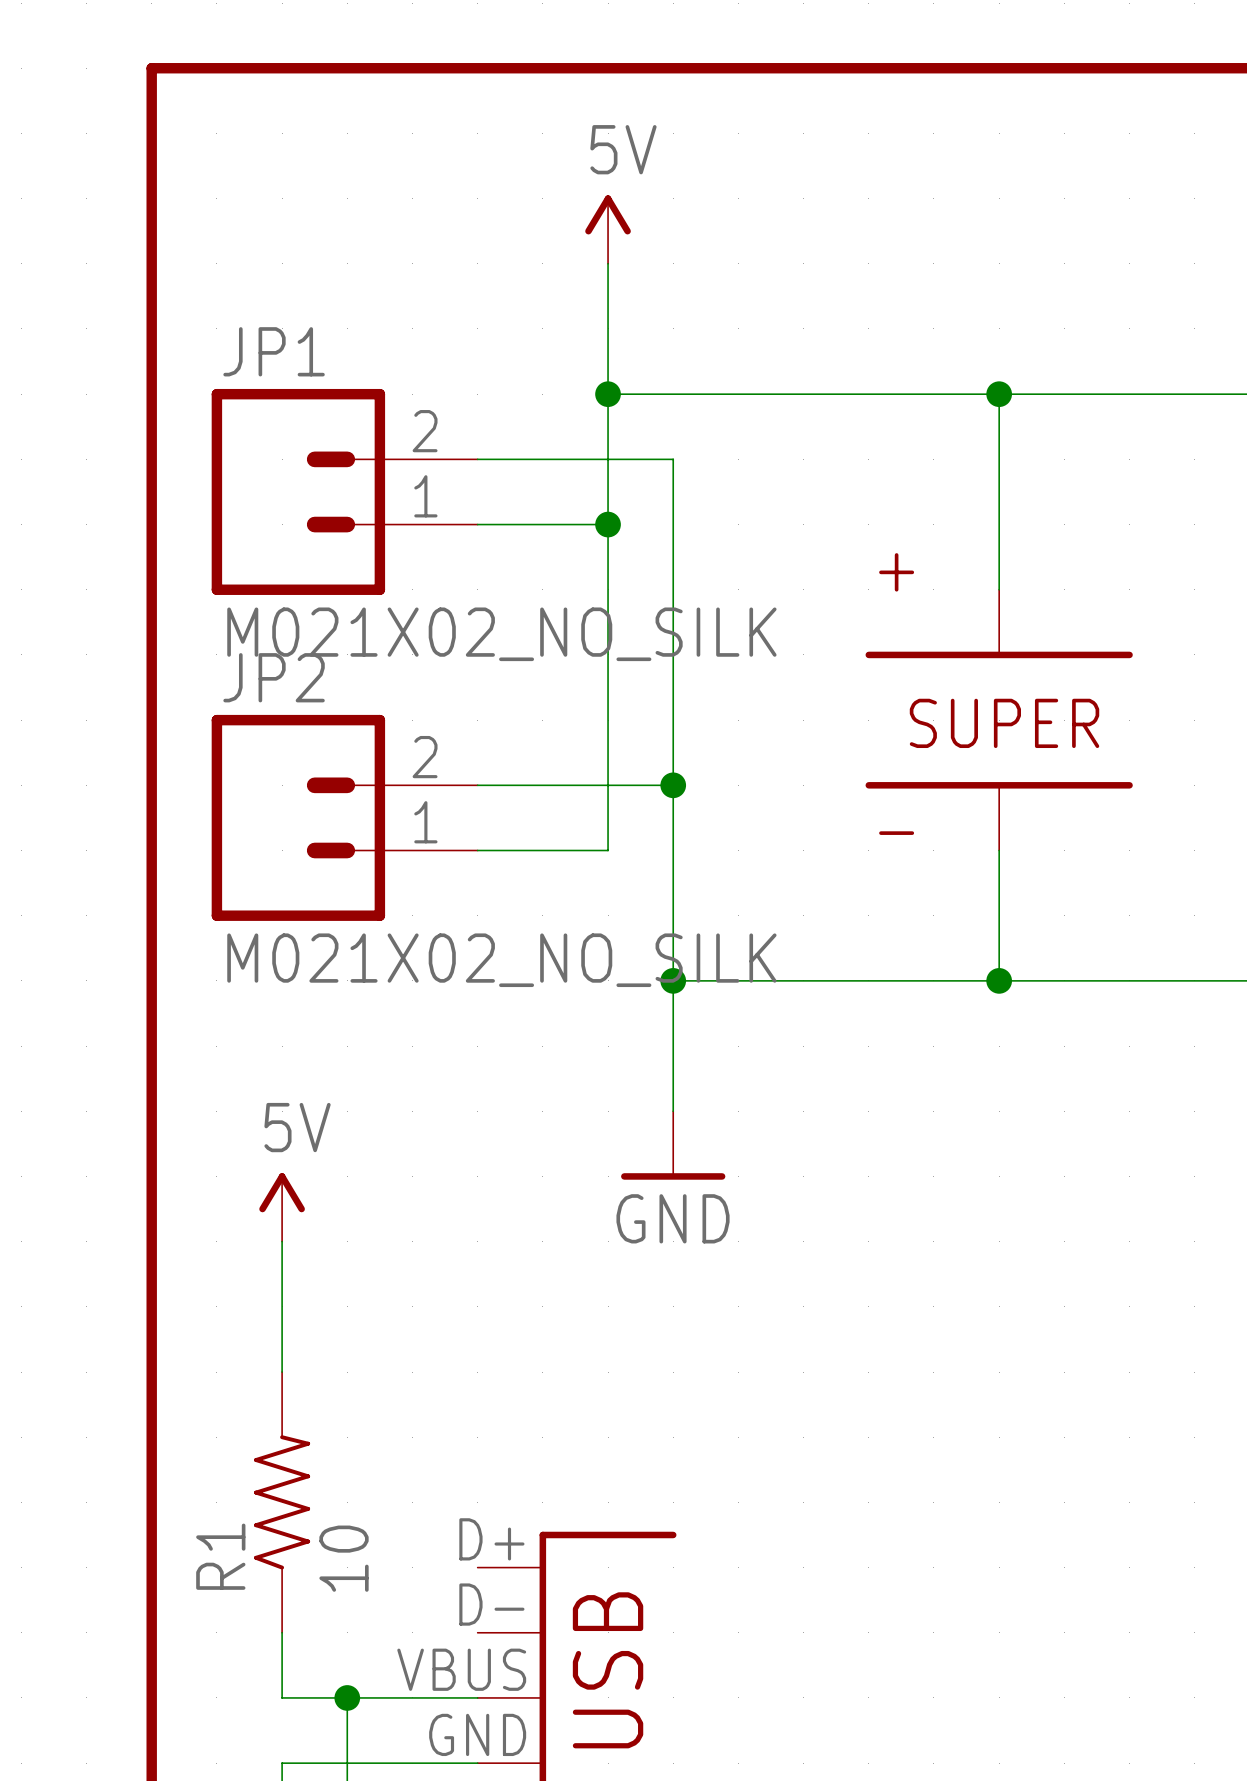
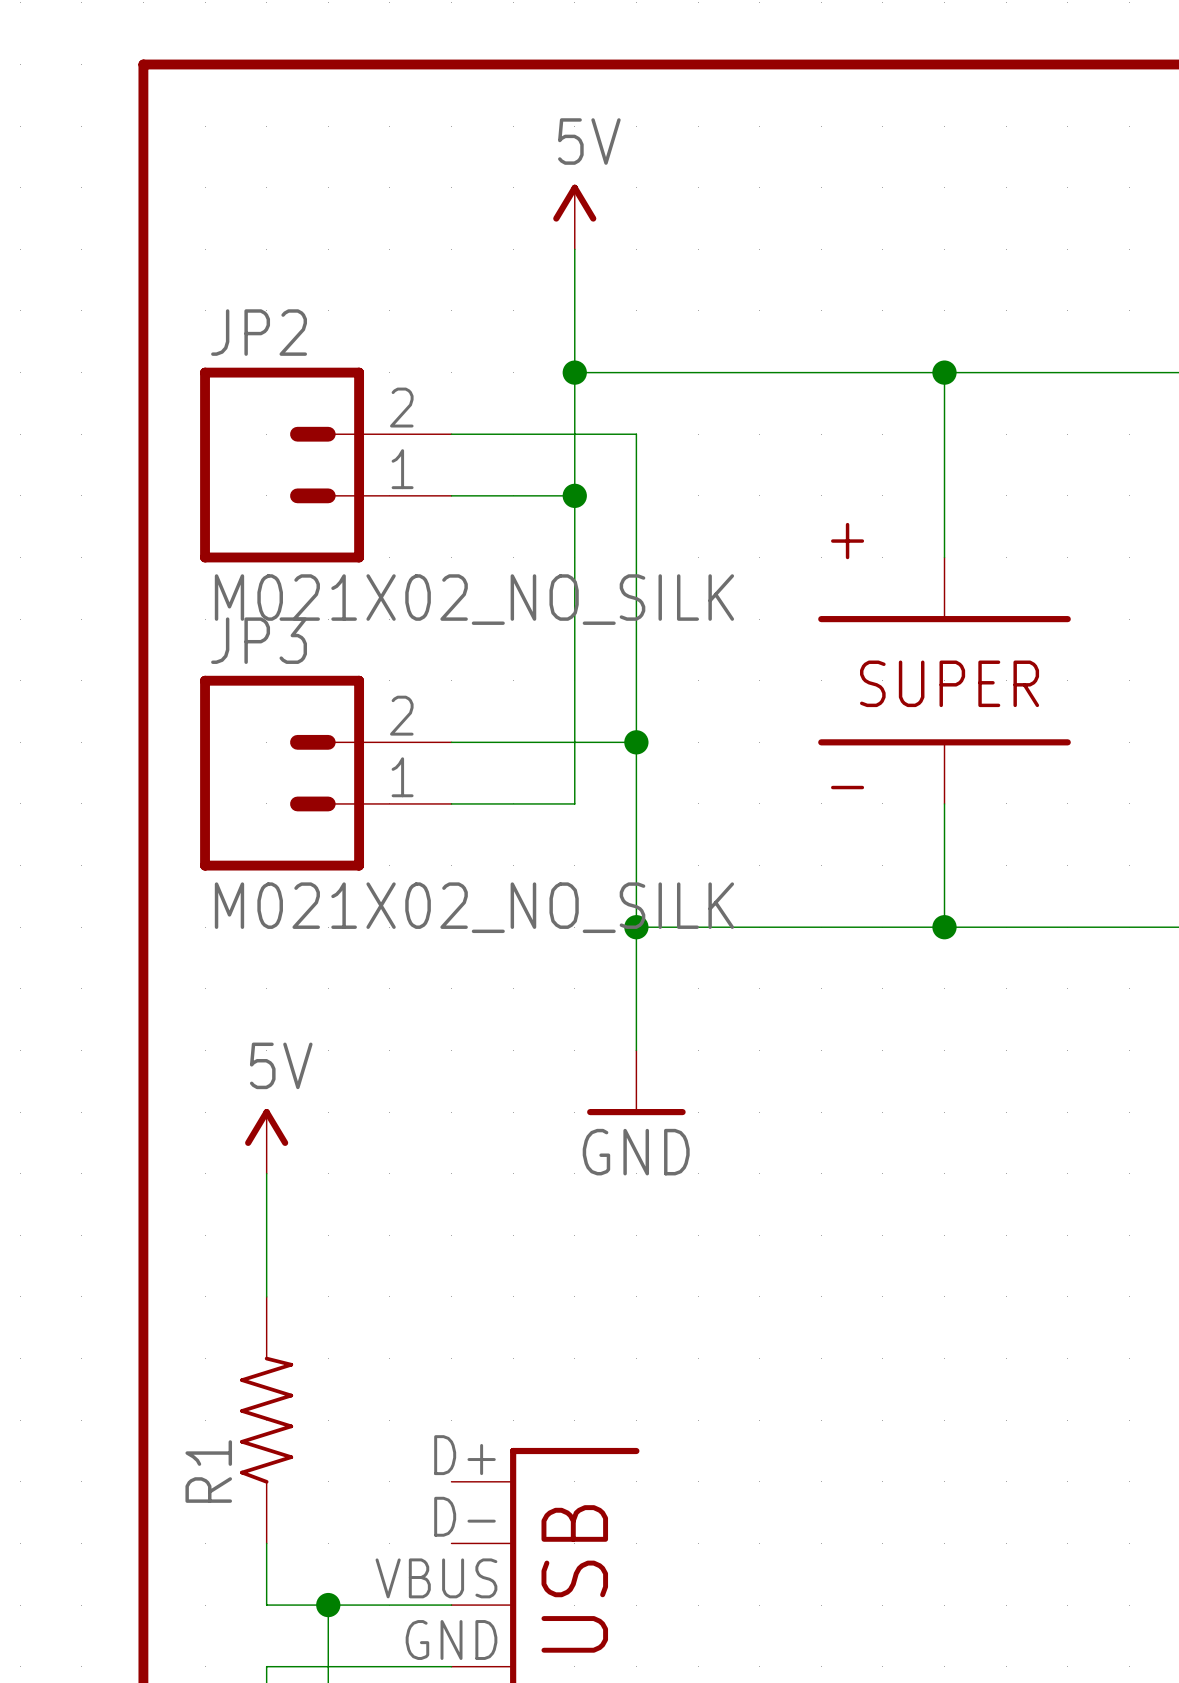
JP1 name: JP1 (274, 351) -> JP2 (259, 332)
JP2 name: JP2 (274, 677) -> JP3 (259, 640)
R1 value: 10 (344, 1558) -> none

